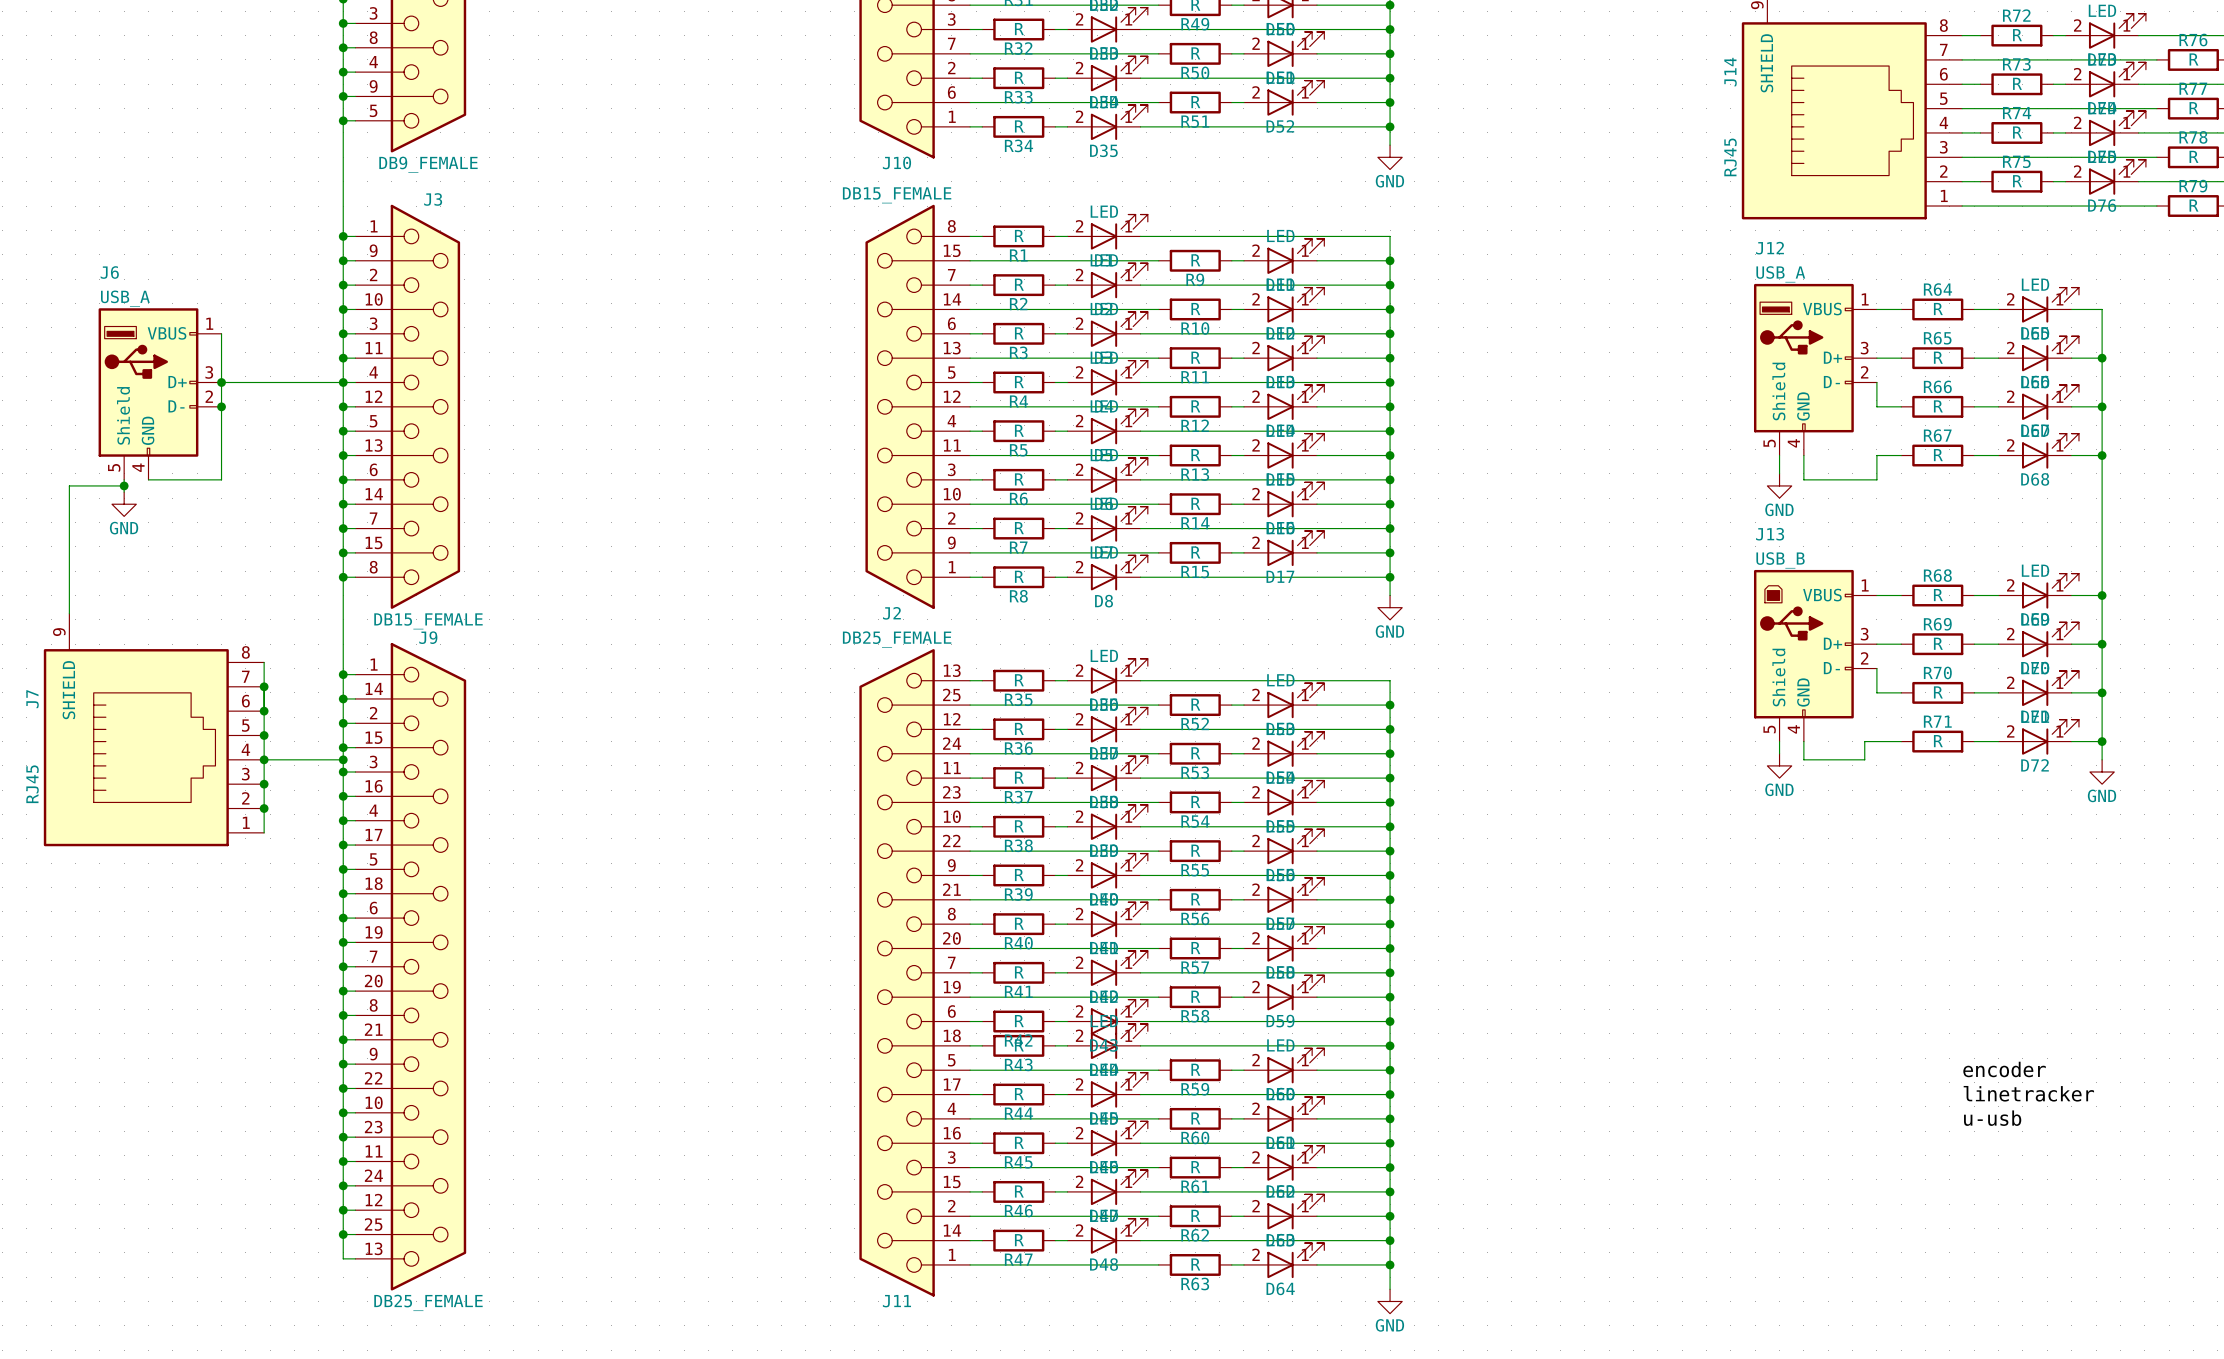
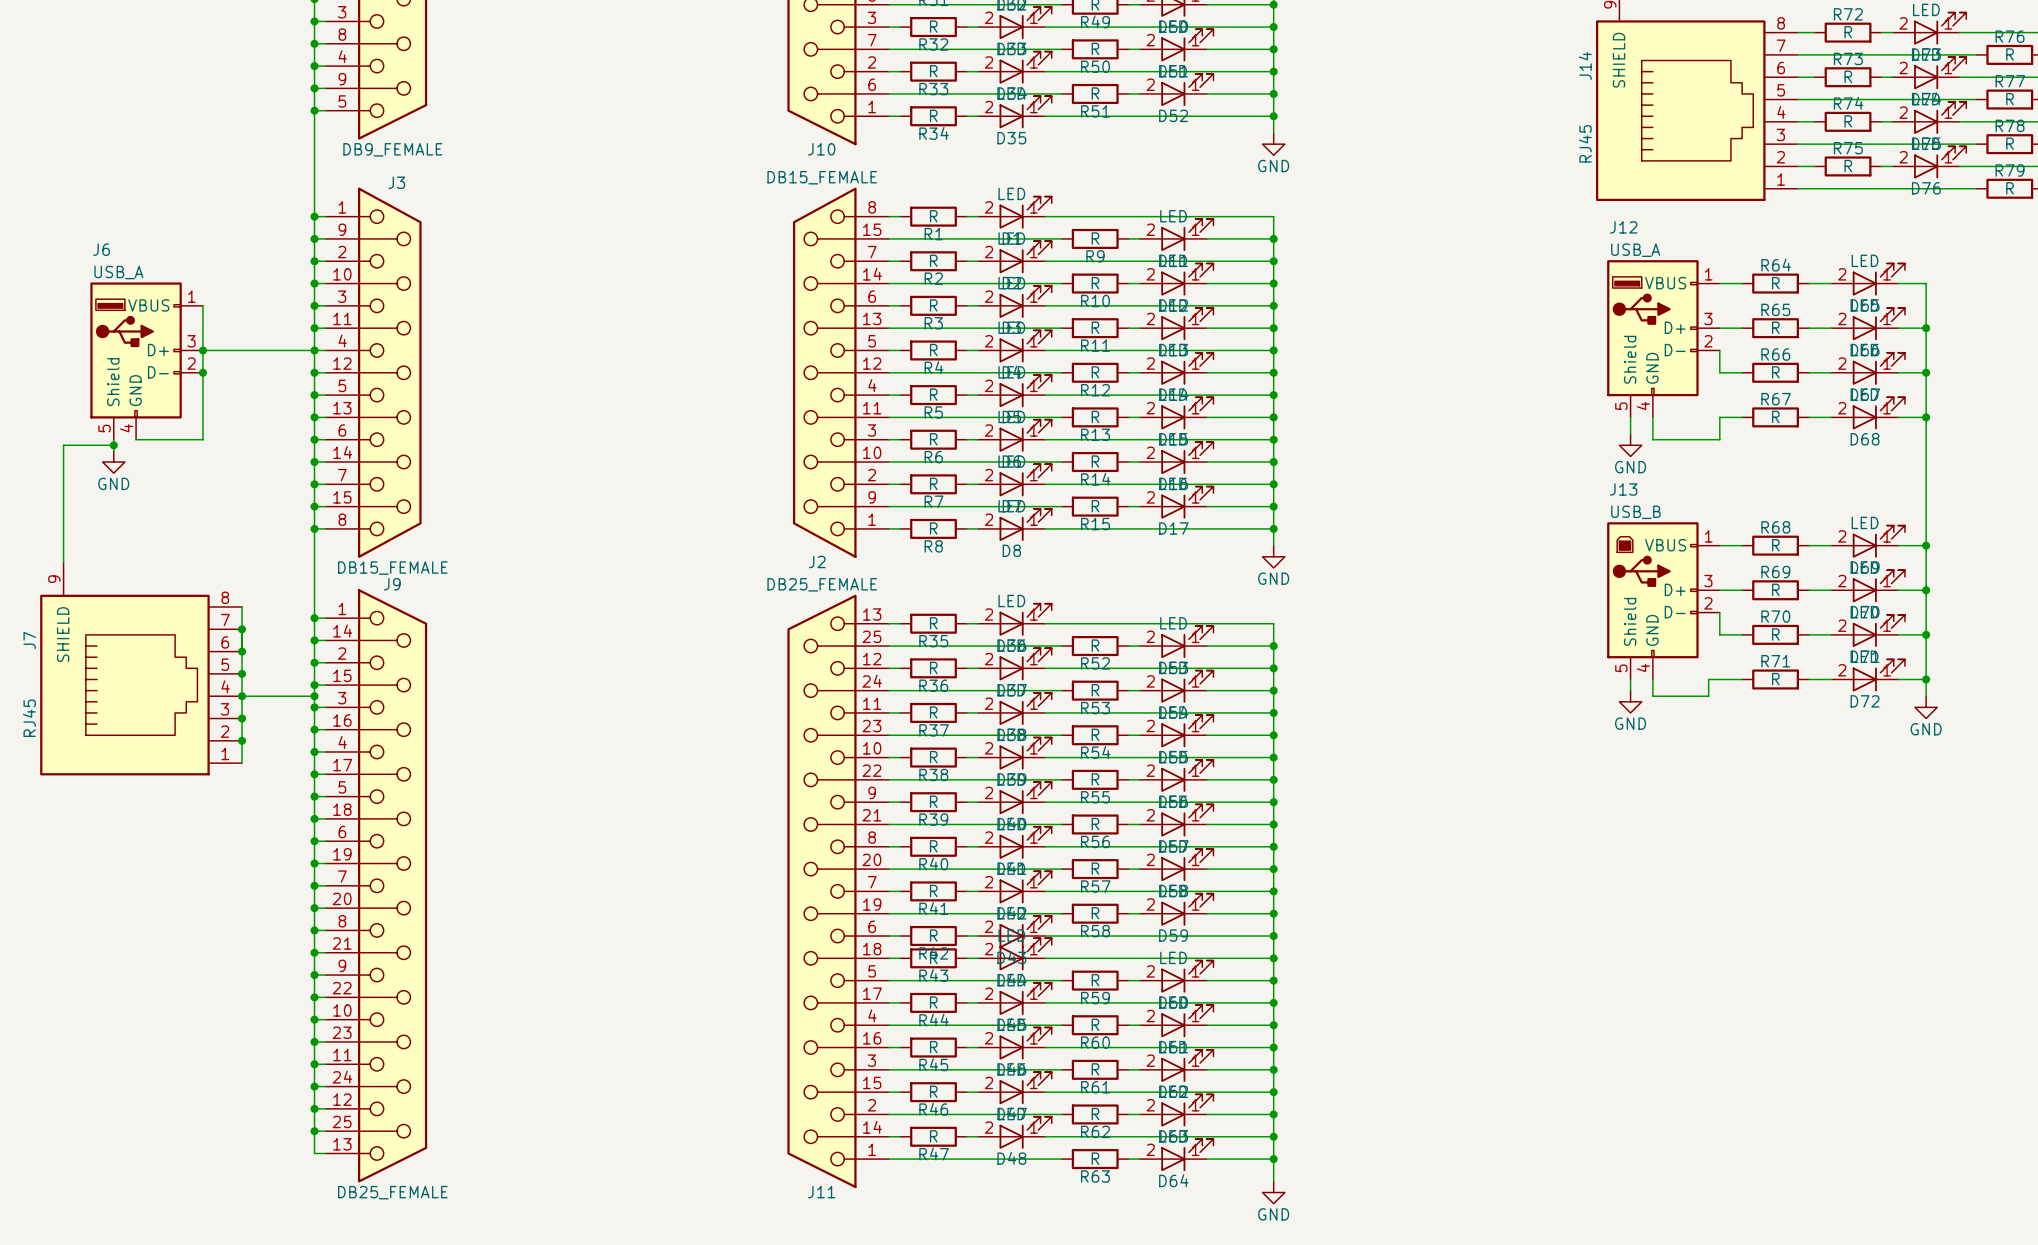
label: encoder (2004, 1069) -> none
label: linetracker (2028, 1093) -> none
label: u-usb (1992, 1118) -> none

